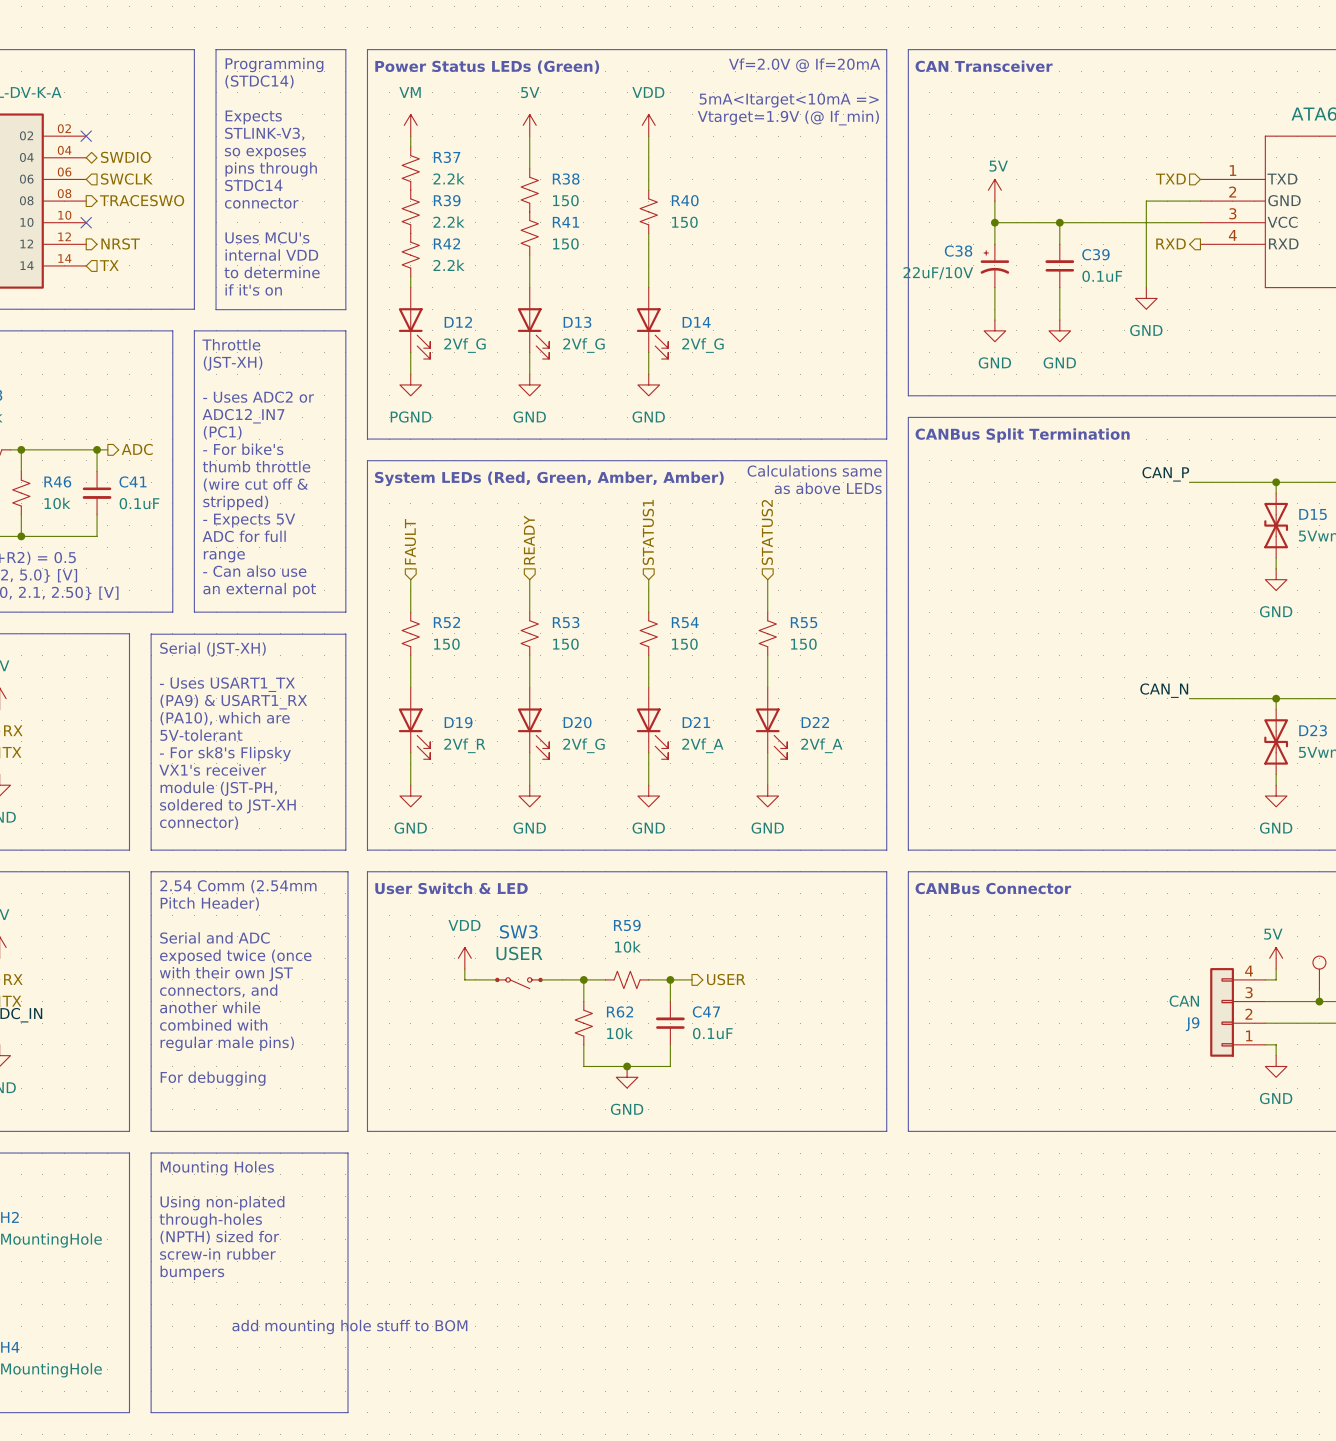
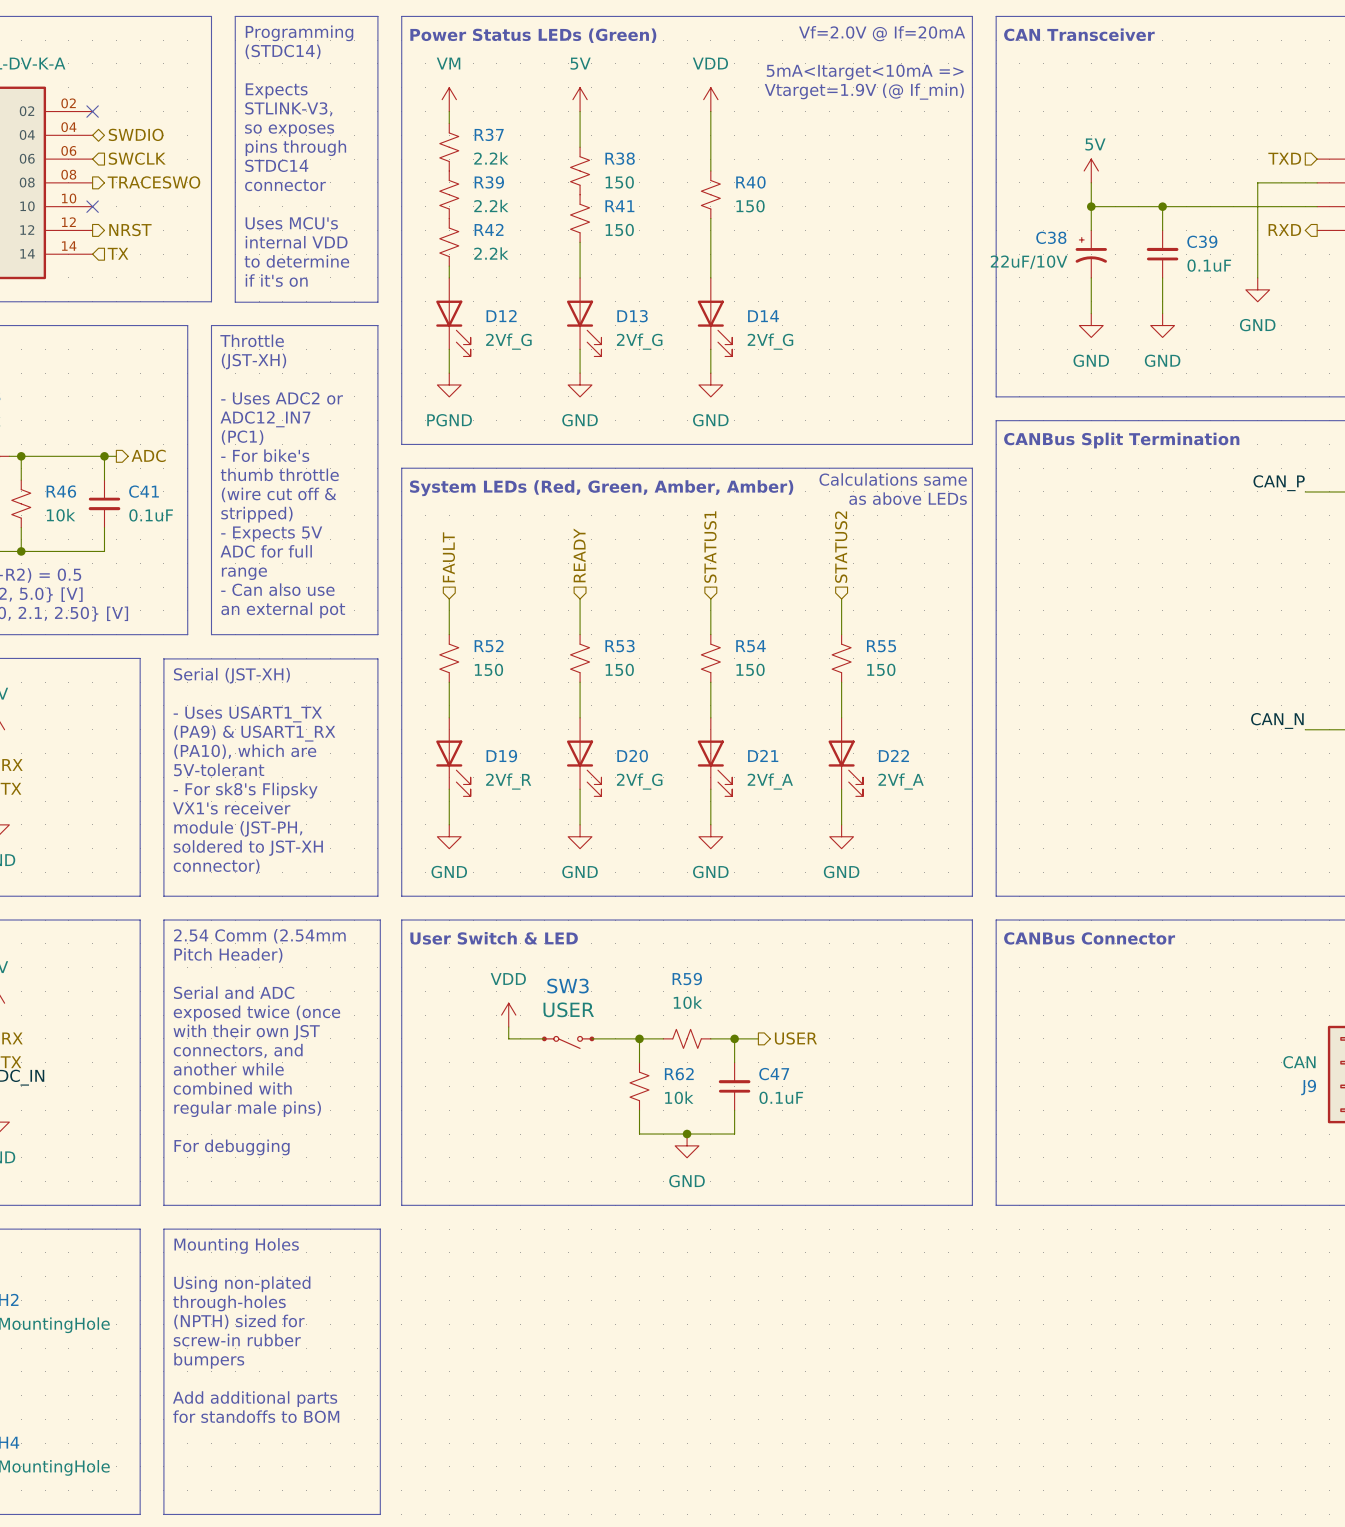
text: none -> Add additional parts (255, 1399)
text: none -> for standoffs to BOM (256, 1416)
text: add mounting hole stuff to BOM (349, 1327) -> none

